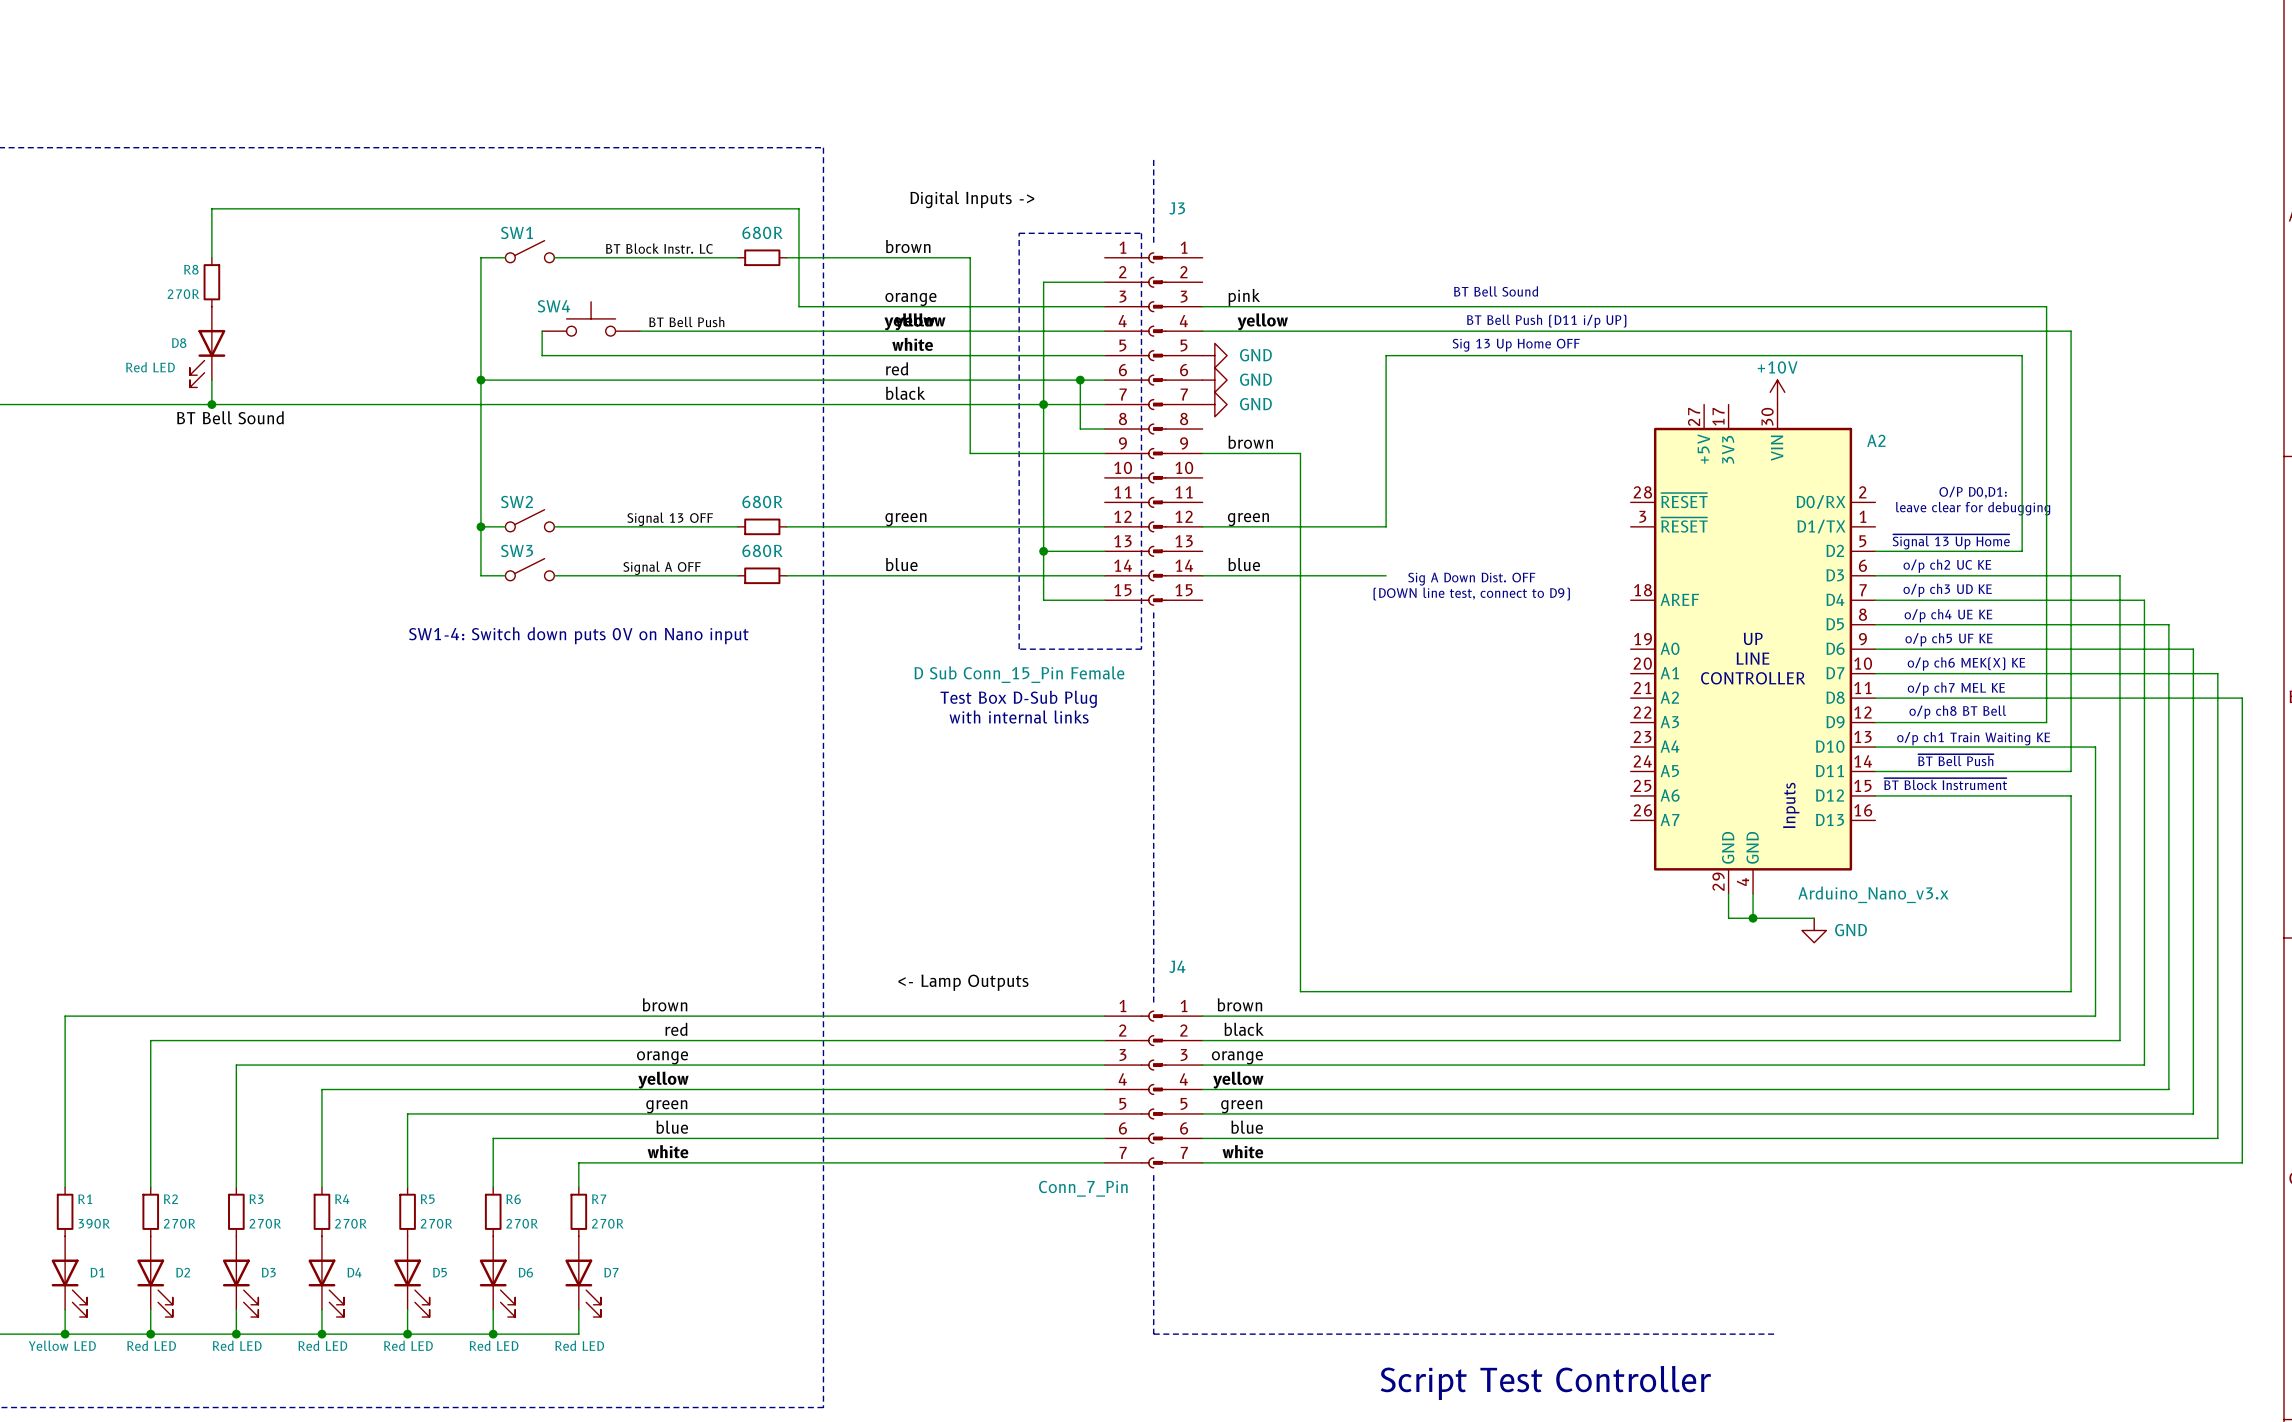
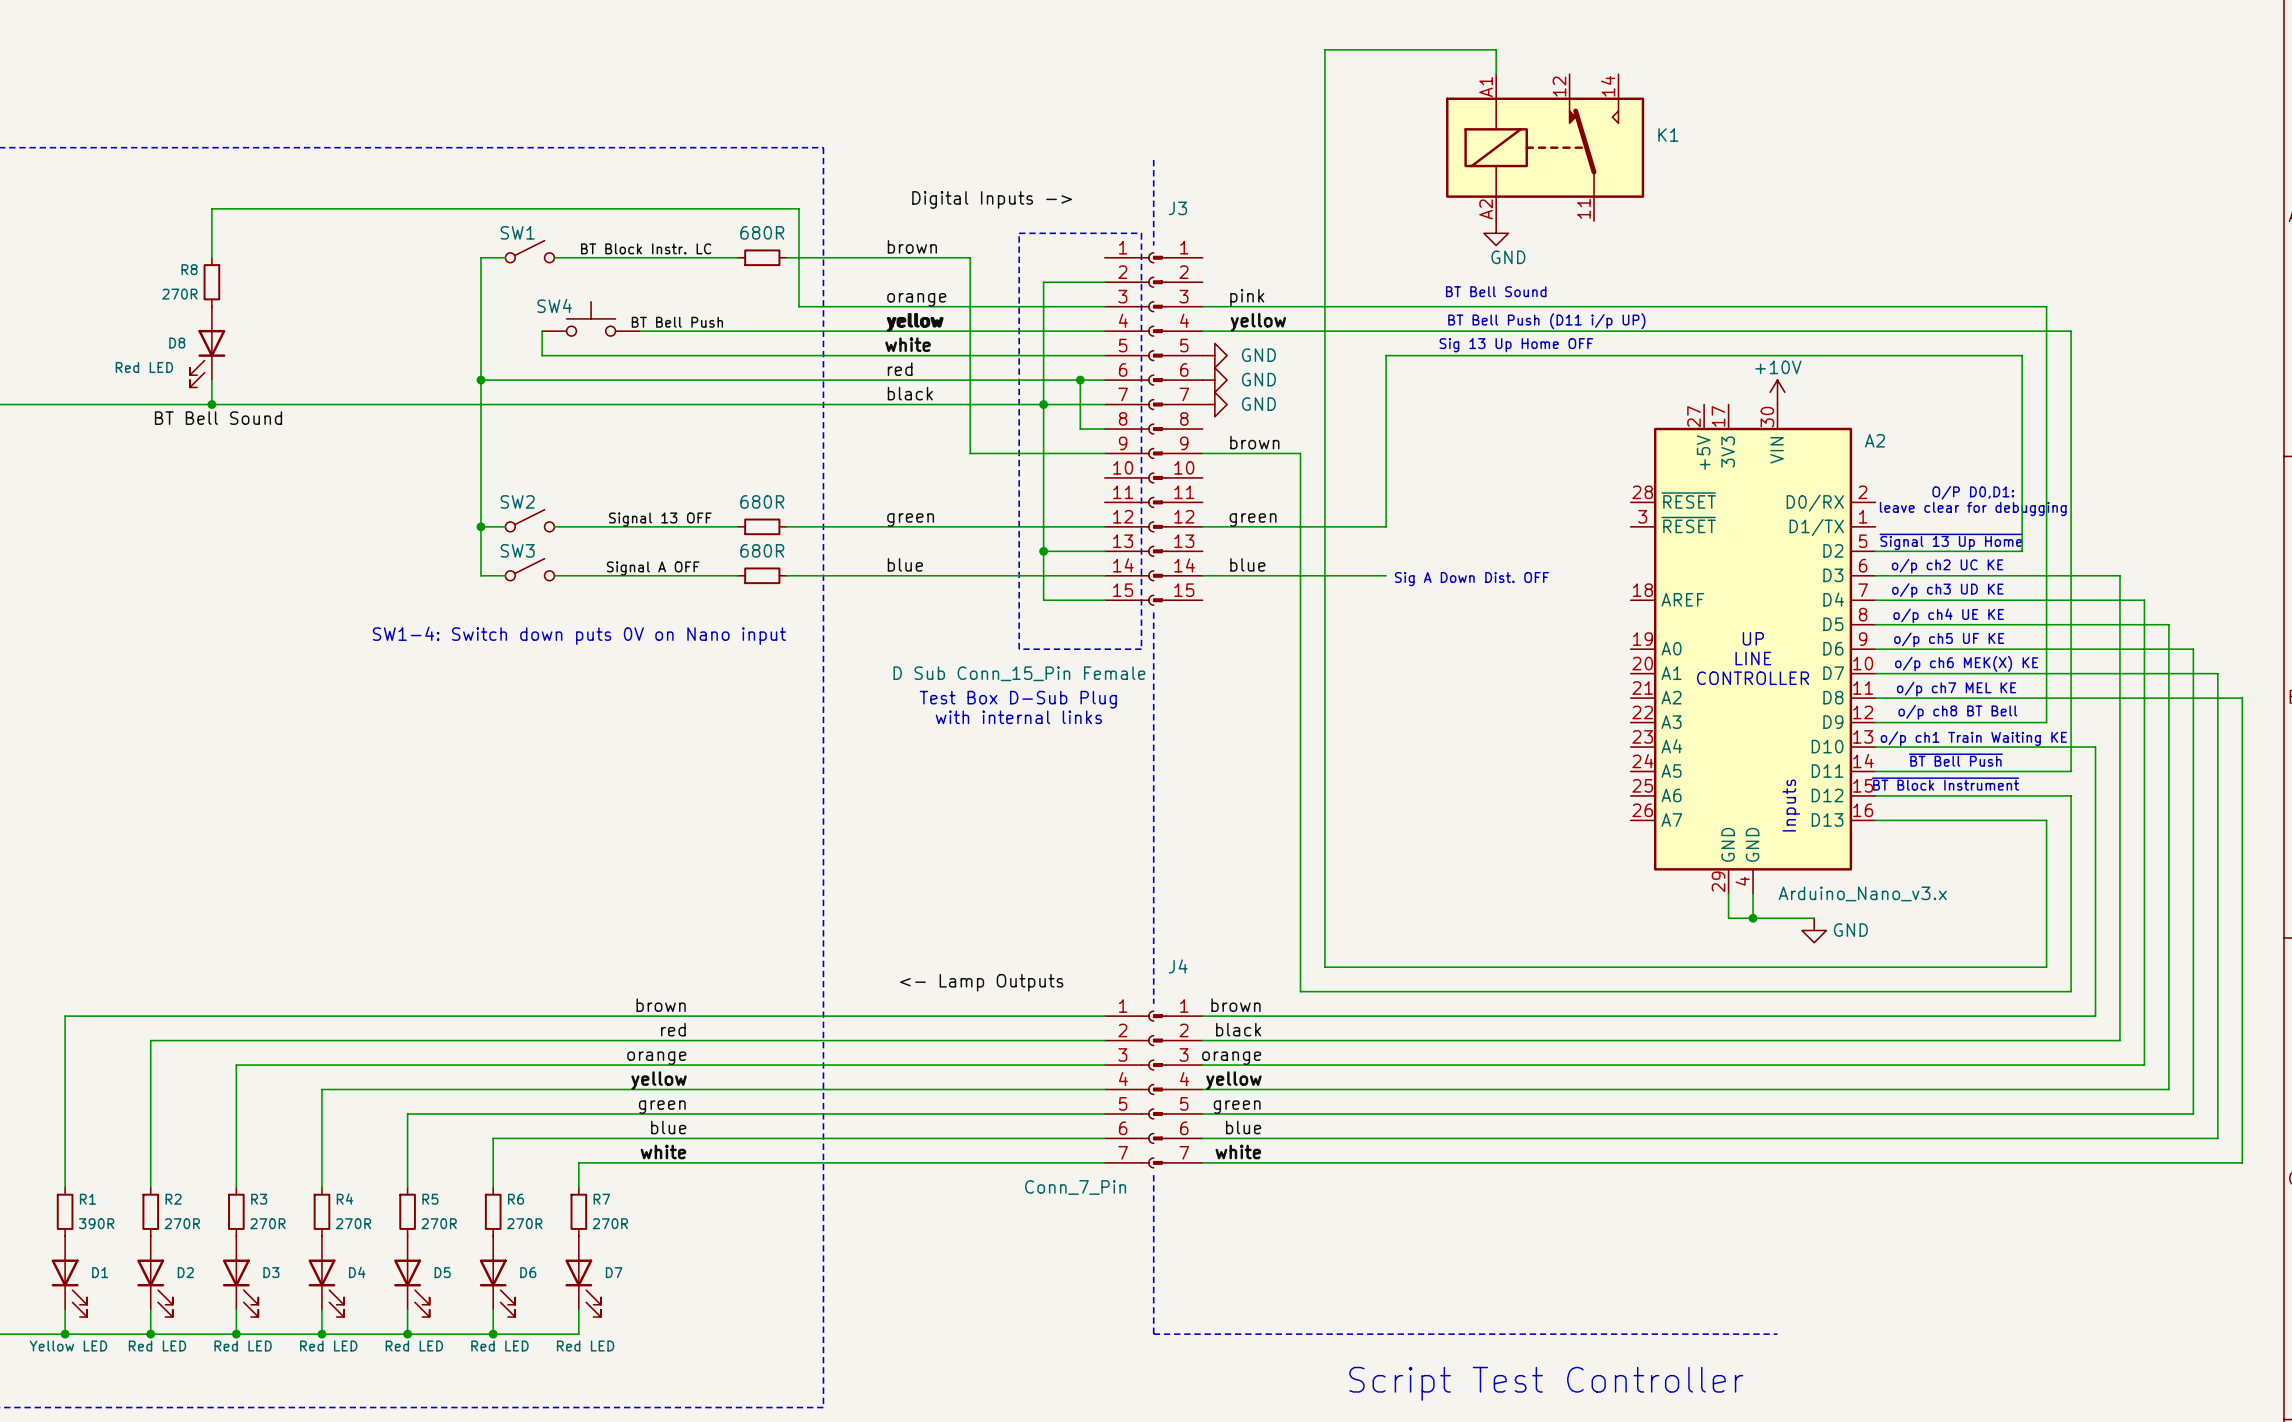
wire: none -> (1496, 74) (1496, 49) (1324, 49) (1324, 967) (2046, 967) (2046, 820) (1875, 820)
K1: none -> (1545, 147)
power symbol: none -> GND (1496, 233)
text: (DOWN line test, connect to D9) (1471, 594) -> none

